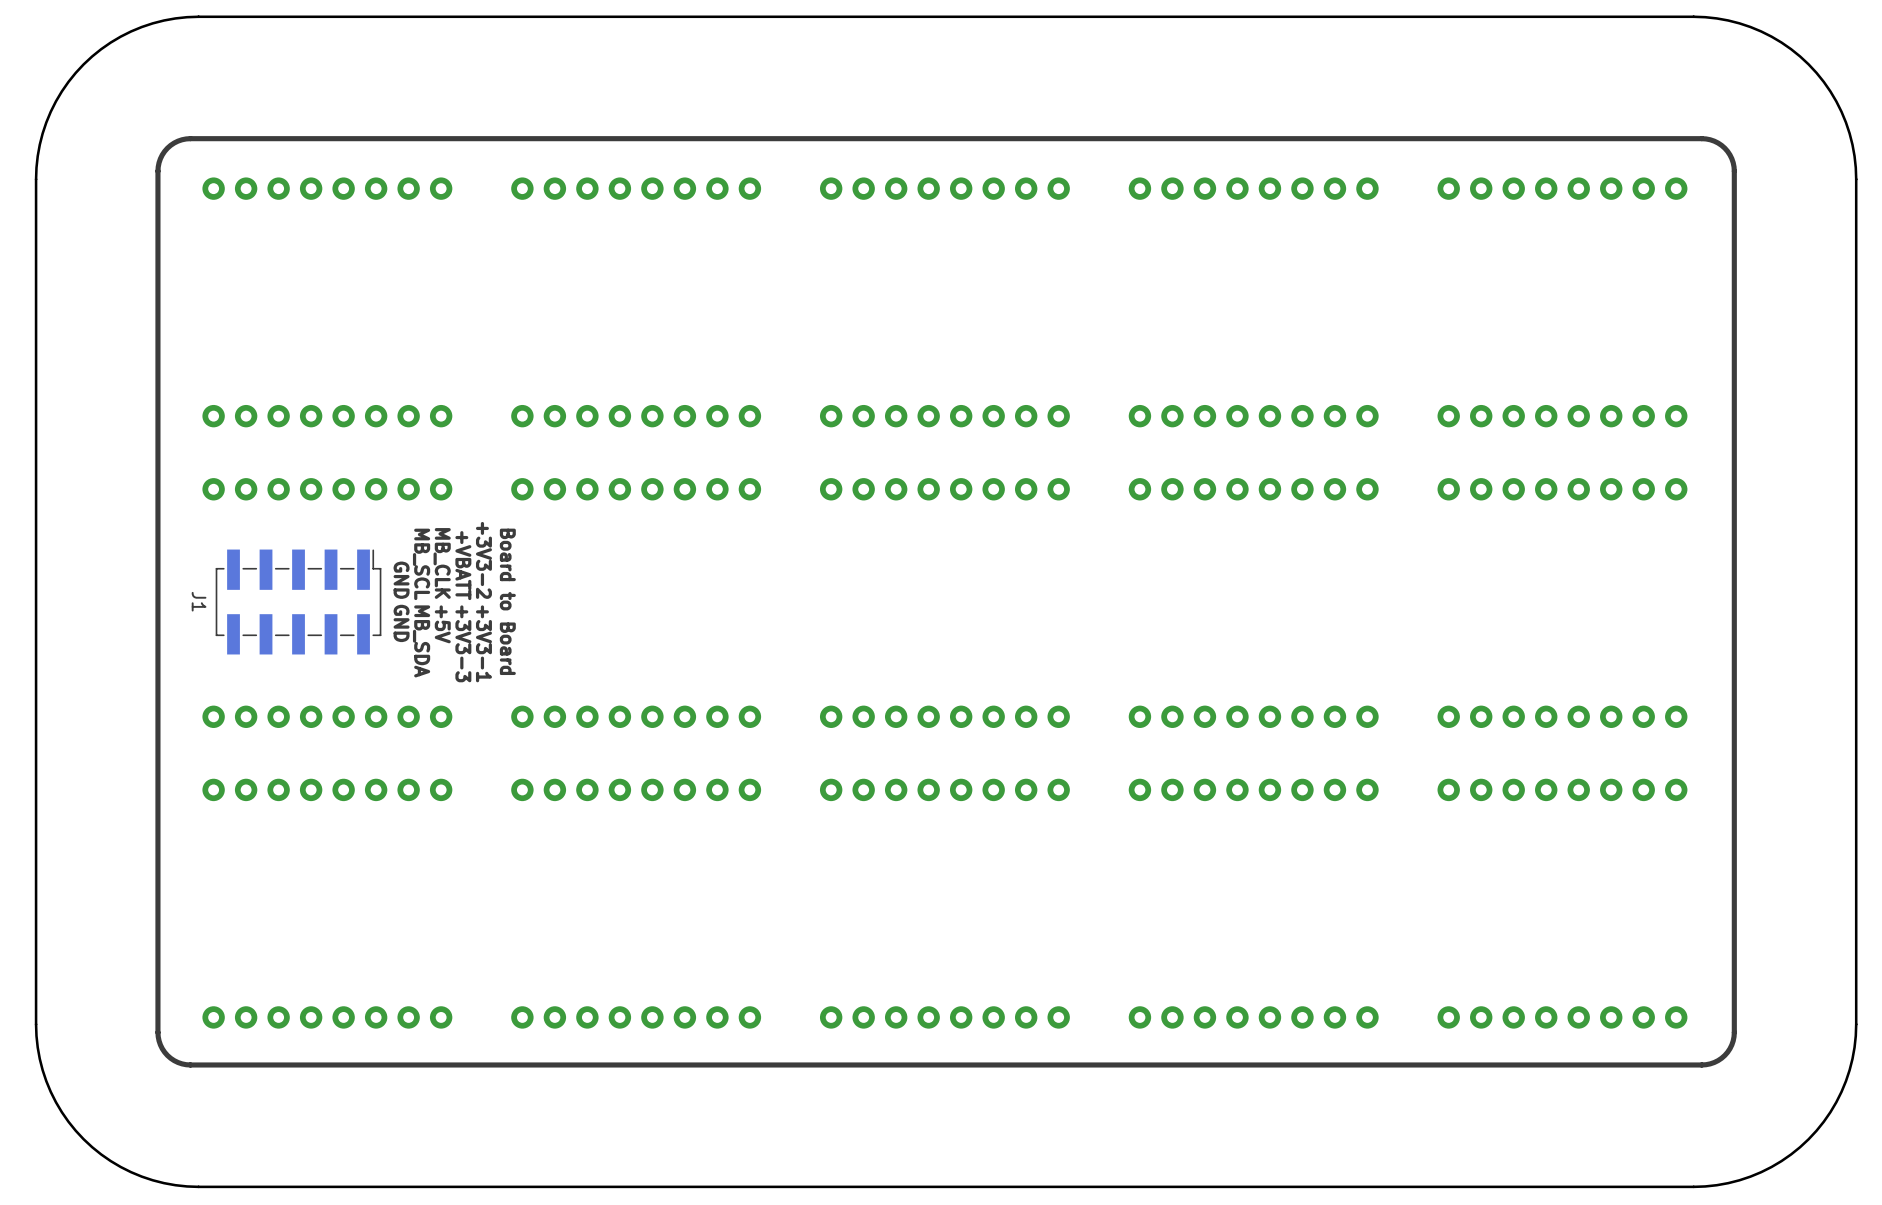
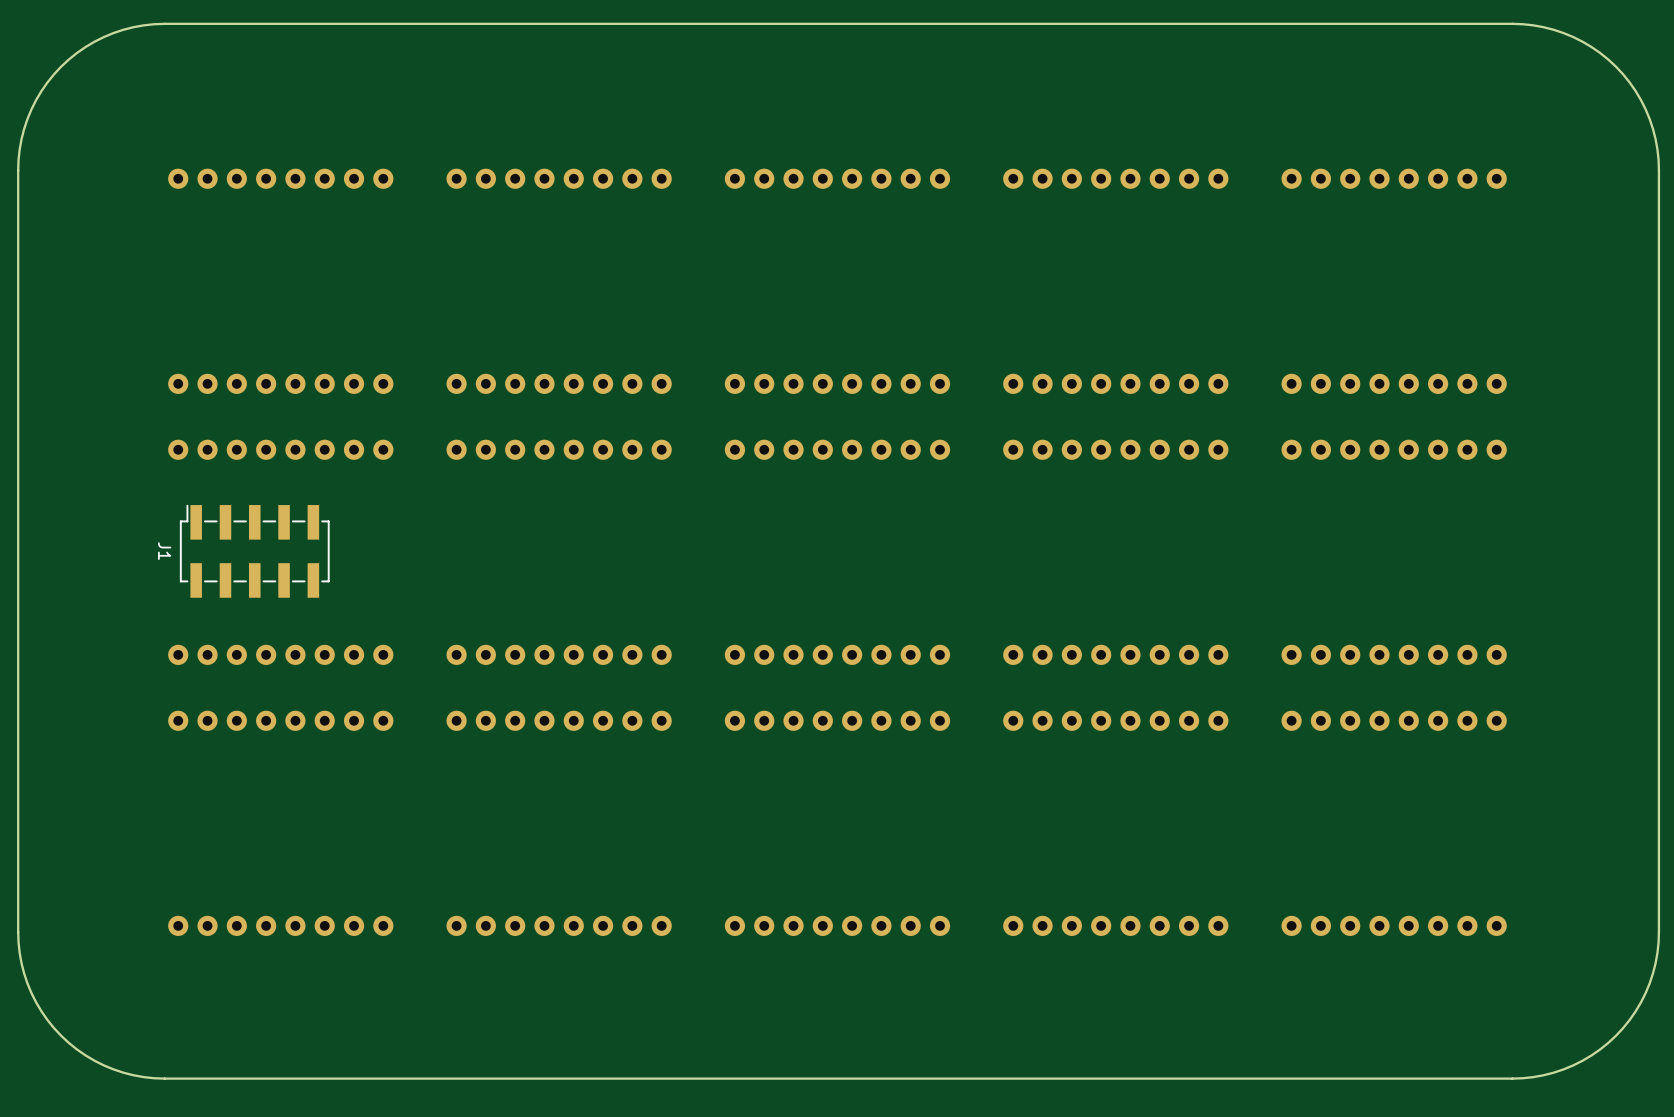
line: (1701, 138) (190, 138) (174, 143) (162, 154) (157, 171) (157, 1032) (162, 1048) (174, 1060) (190, 1064) (1701, 1064) (1718, 1060) (1729, 1048) (1734, 1032) (1734, 171) (1731, 158) (1724, 148) (1714, 141) (1701, 138) -> none
J1 footprint: [215, 549, 382, 655] -> [180, 505, 330, 598]
text: +3V3-2 (483, 560) -> none
text: MB_CLK (442, 563) -> none
text: MB_SCL (421, 564) -> none
text: +VBATT (463, 565) -> none
text: GND (401, 580) -> none
J1 value: Board to Board (507, 601) -> none
text: GND (401, 623) -> none
text: +5V (442, 624) -> none
text: MB_SDA (421, 641) -> none
text: +3V3-3 (463, 643) -> none
text: +3V3-1 (483, 643) -> none

